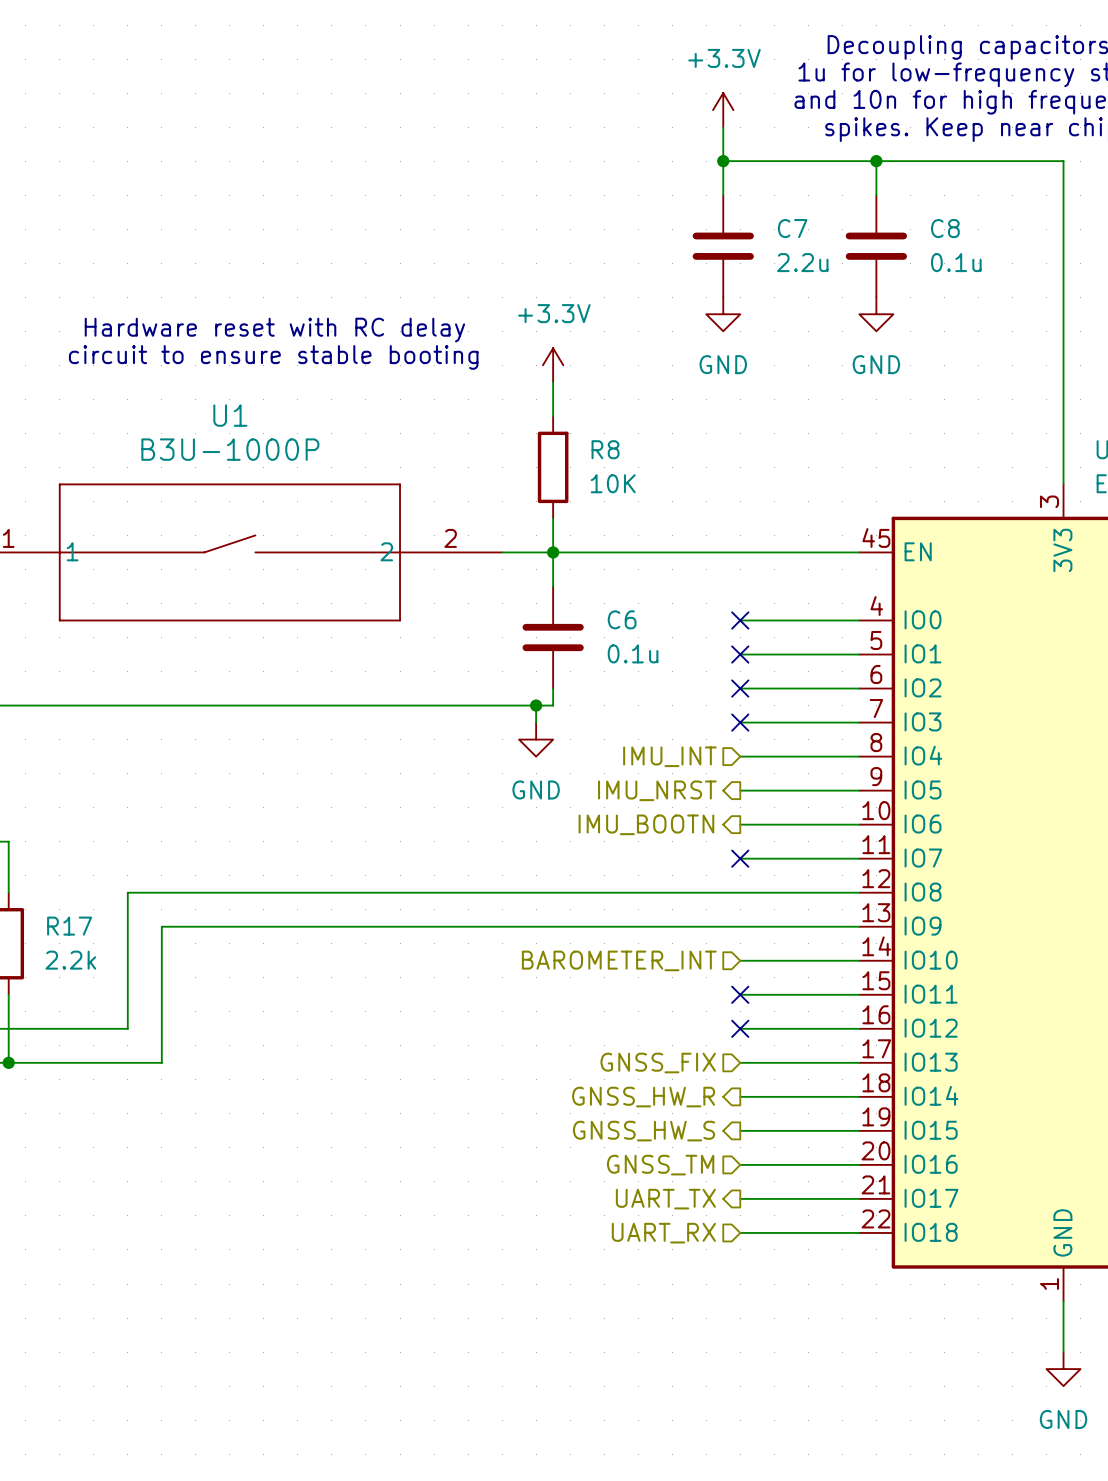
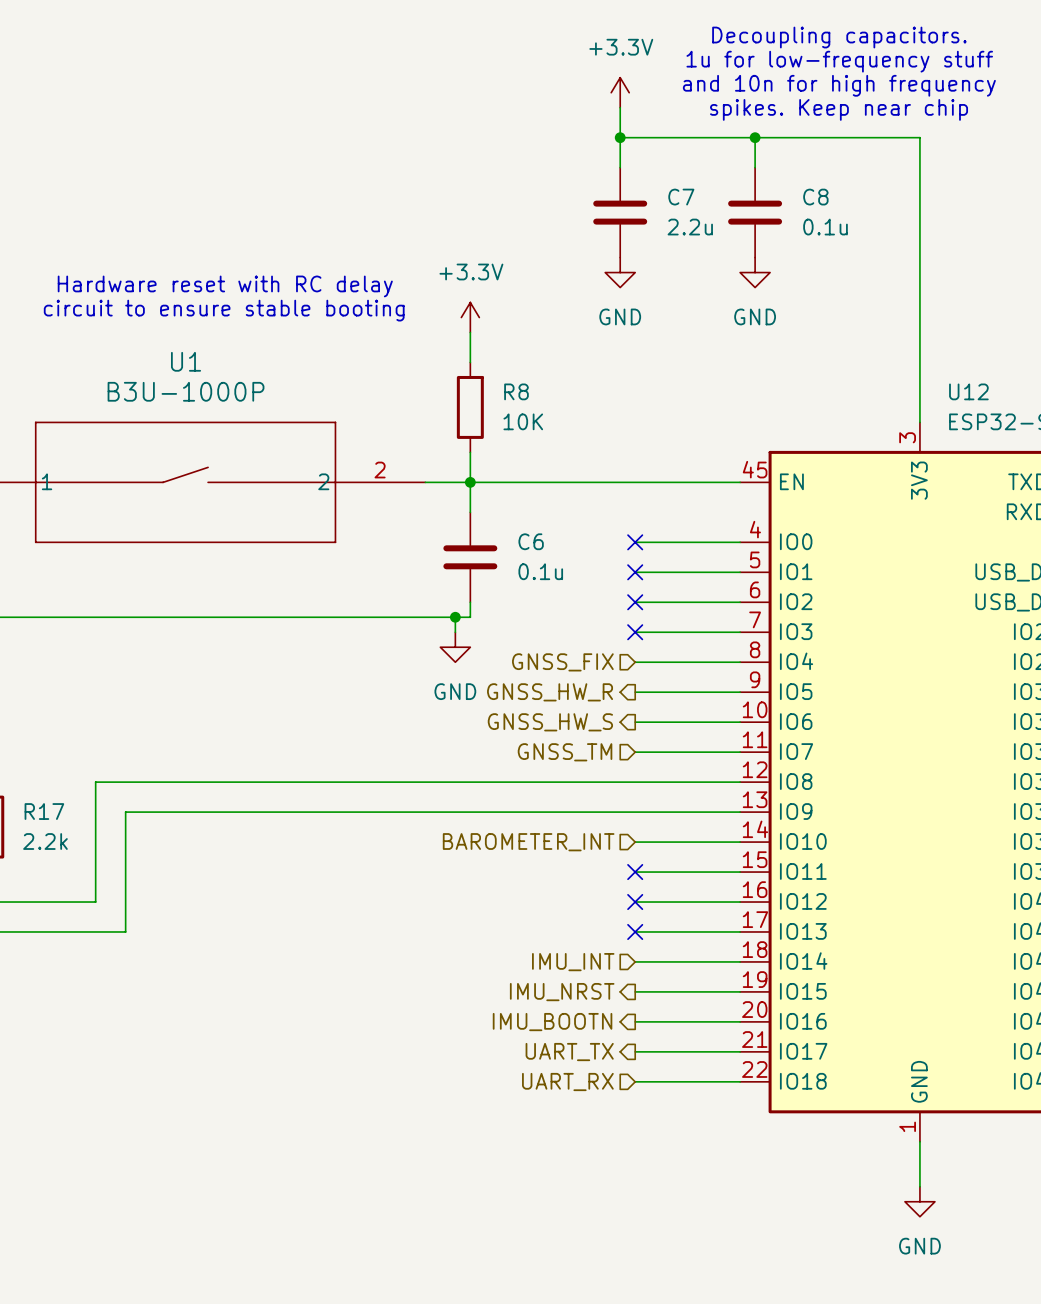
hierarchical label: IMU_INT (669, 756) -> GNSS_FIX (562, 662)
hierarchical label: IMU_NRST (657, 790) -> GNSS_HW_R (550, 692)
hierarchical label: IMU_BOOTN (646, 824) -> GNSS_HW_S (550, 722)
hierarchical label: none -> GNSS_TM (565, 752)
no-connect mark: (740, 858) -> none
no-connect mark: none -> (635, 931)
hierarchical label: GNSS_FIX (658, 1063) -> none
hierarchical label shape: output (643, 1097) -> input (573, 962)
hierarchical label: GNSS_HW_R (643, 1097) -> IMU_INT (573, 962)
hierarchical label: GNSS_HW_S (644, 1131) -> IMU_NRST (562, 992)
hierarchical label shape: input (660, 1165) -> output (552, 1022)
hierarchical label: GNSS_TM (660, 1165) -> IMU_BOOTN (552, 1022)

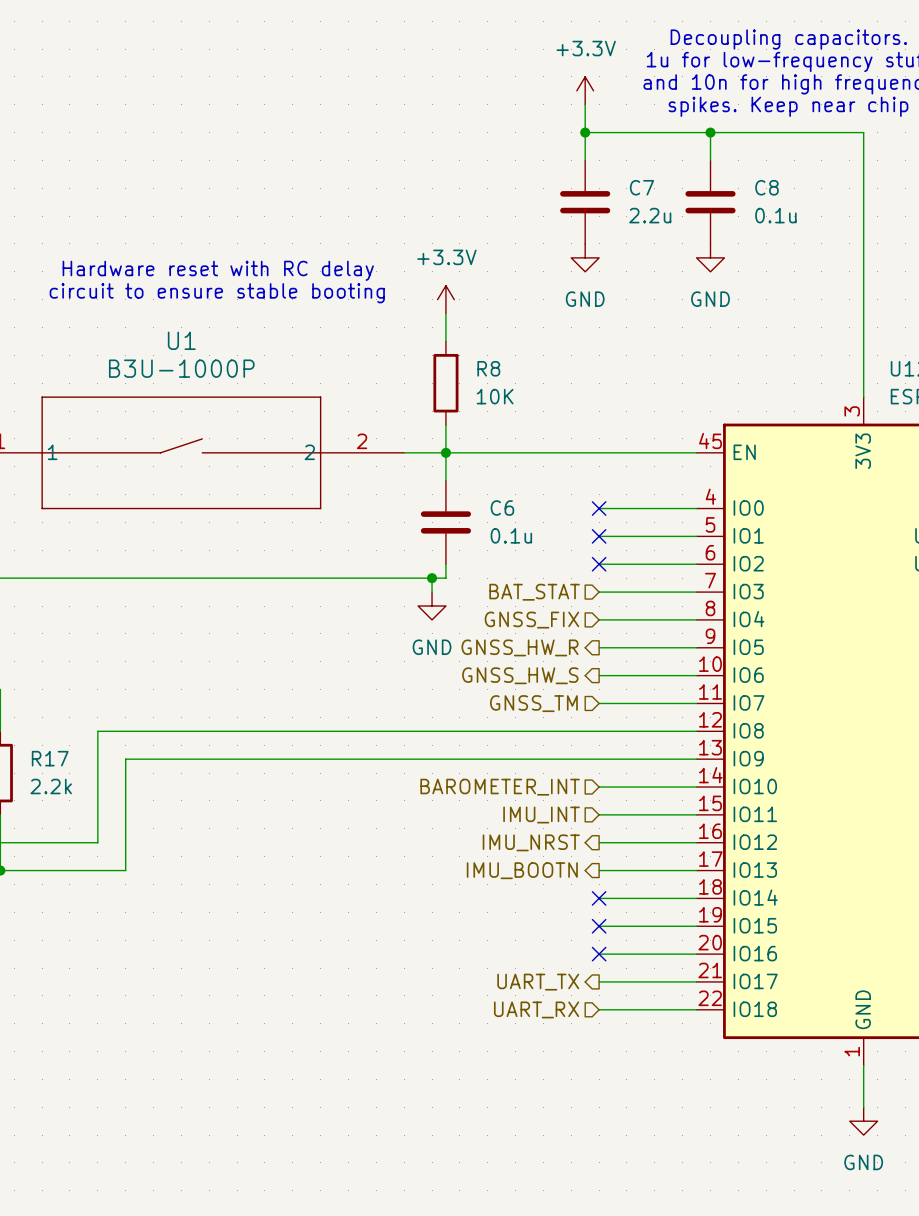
hierarchical label: none -> BAT_STAT (534, 592)
no-connect mark: (635, 632) -> none
no-connect mark: (635, 872) -> none
no-connect mark: (635, 902) -> none
no-connect mark: (635, 931) -> none
no-connect mark: none -> (599, 898)
hierarchical label position: IMU_INT (573, 962) -> IMU_INT (541, 815)
no-connect mark: none -> (599, 926)
hierarchical label position: IMU_NRST (562, 992) -> IMU_NRST (531, 842)
no-connect mark: none -> (599, 954)
hierarchical label position: IMU_BOOTN (552, 1022) -> IMU_BOOTN (522, 870)

